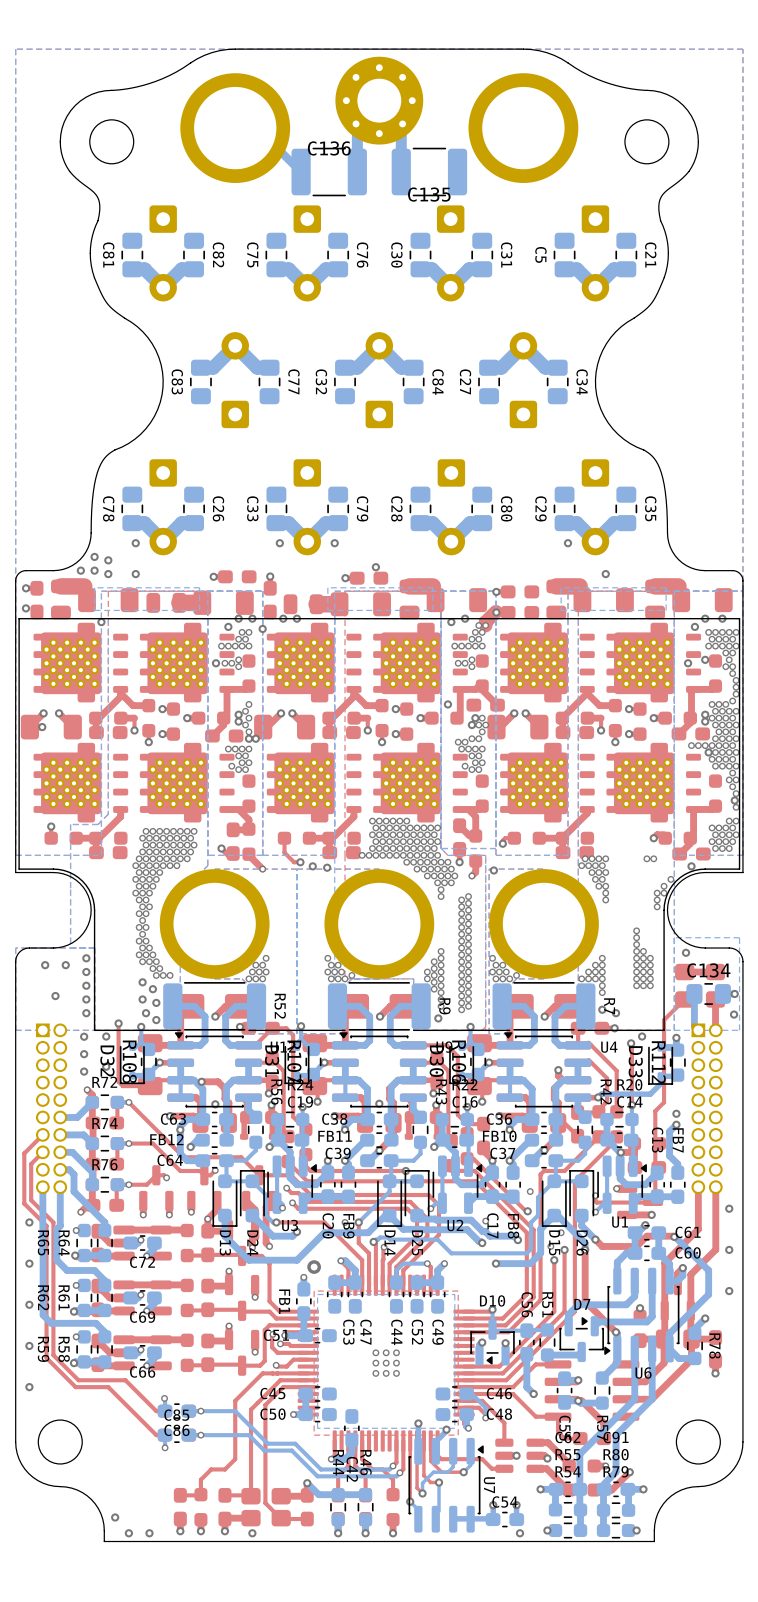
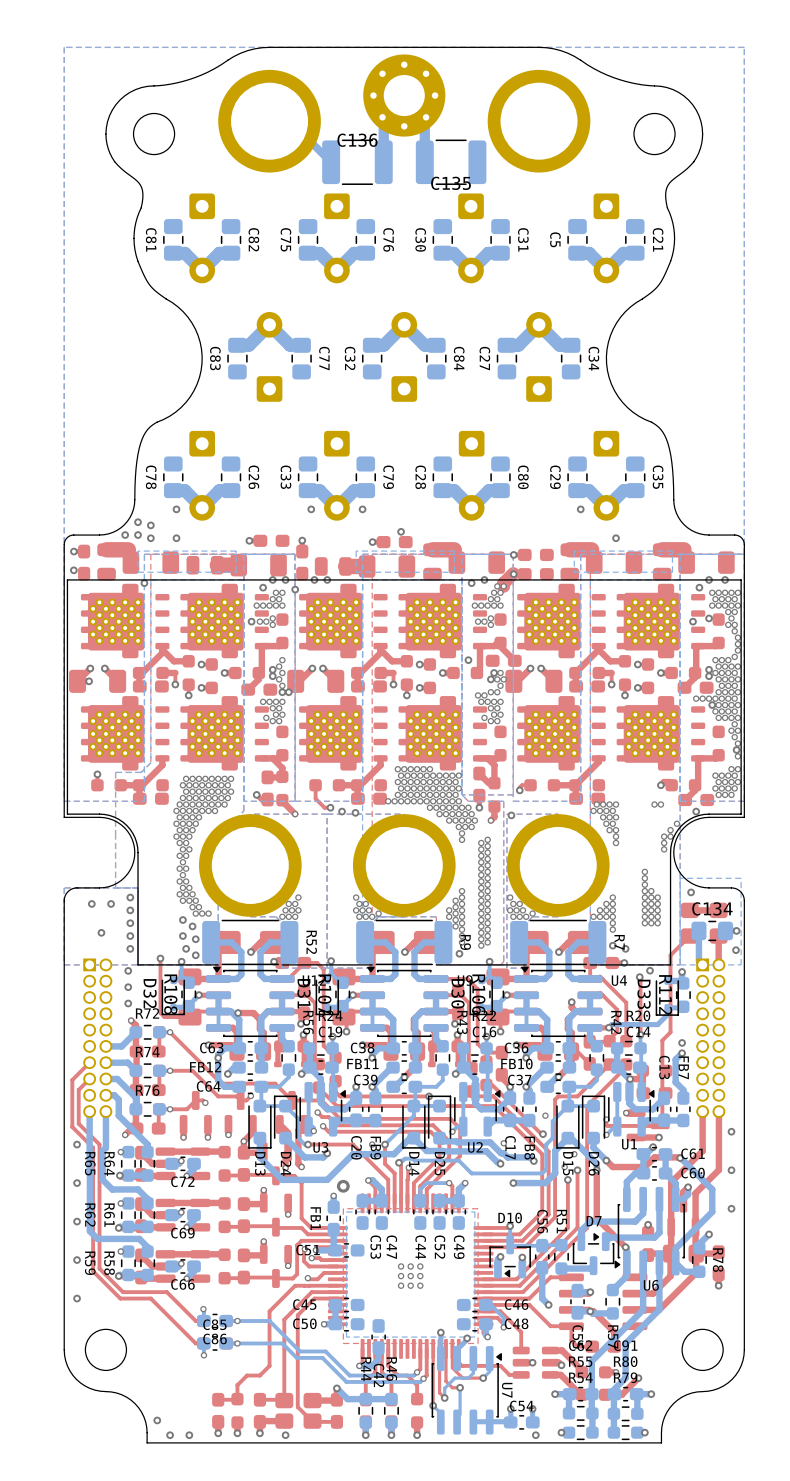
via: (106, 1036) -> none
via: (106, 1066) -> none
via: (379, 1103) -> none
via: (215, 1104) -> none

